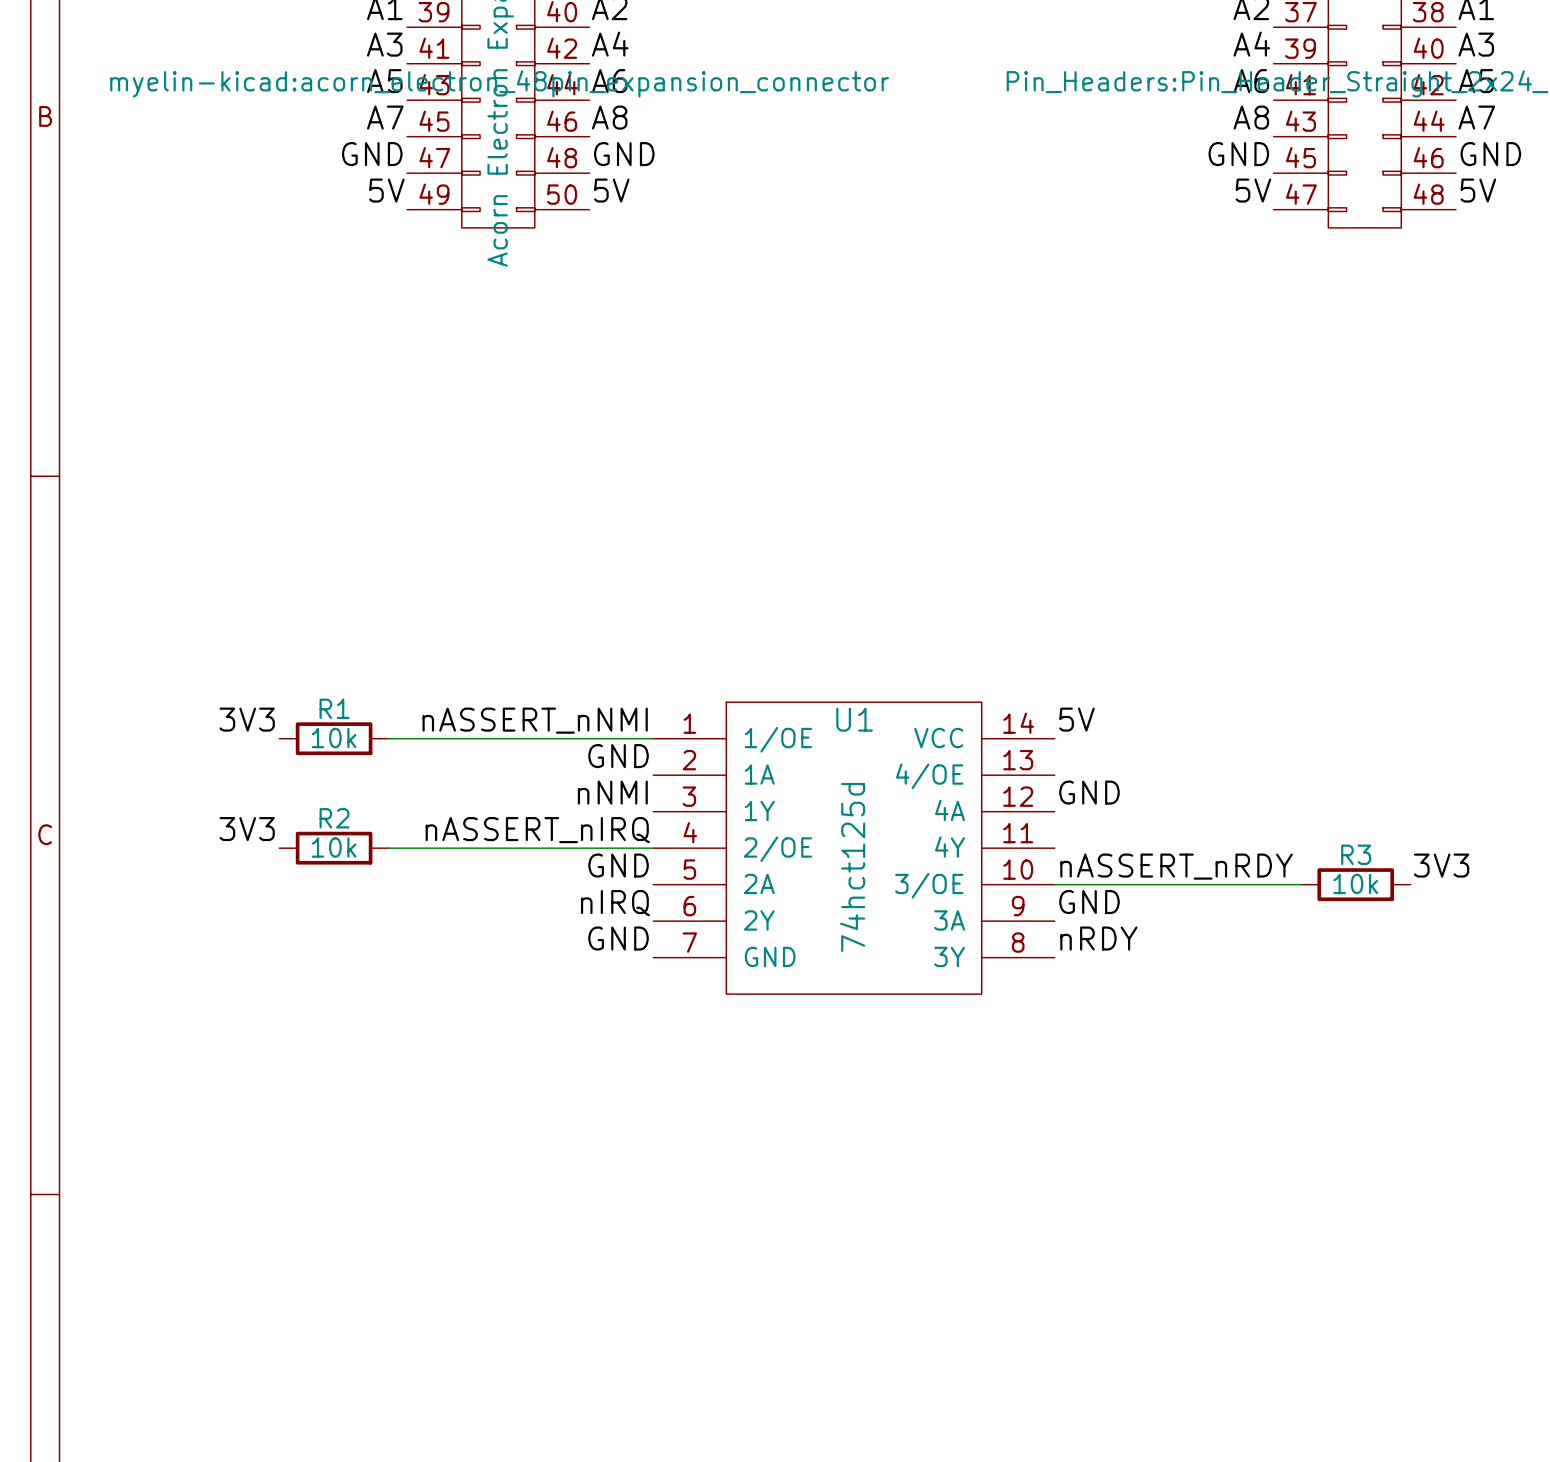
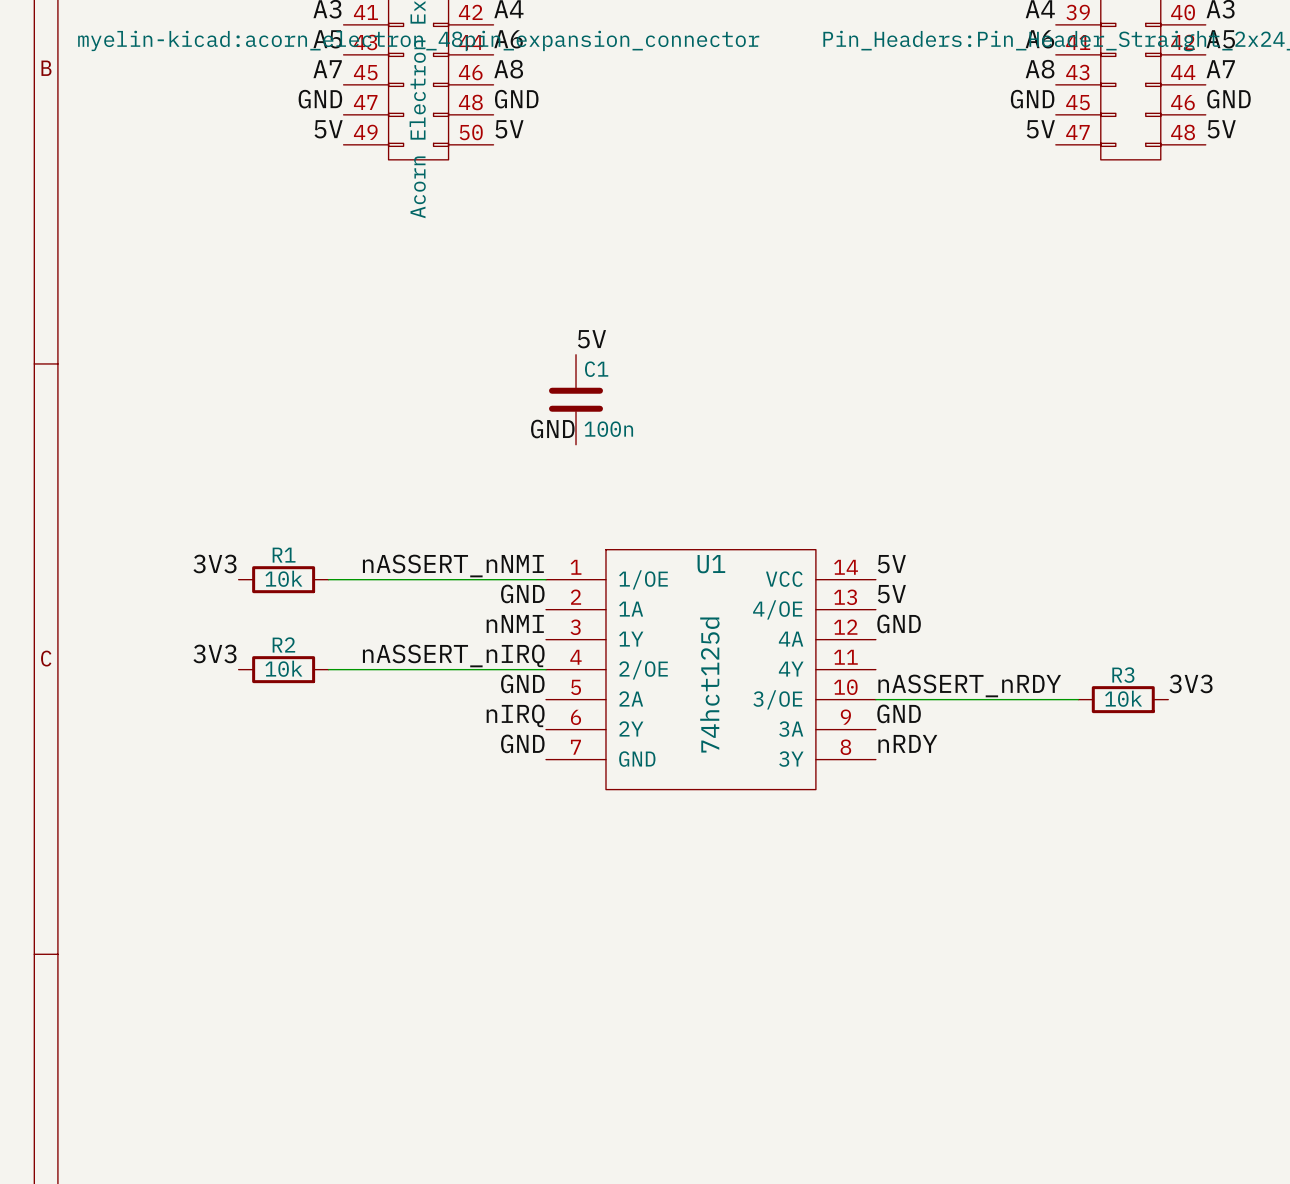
label: none -> 5V (591, 339)
C1: none -> 100n (576, 399)
label: none -> GND (552, 429)
label: none -> 5V (891, 594)

